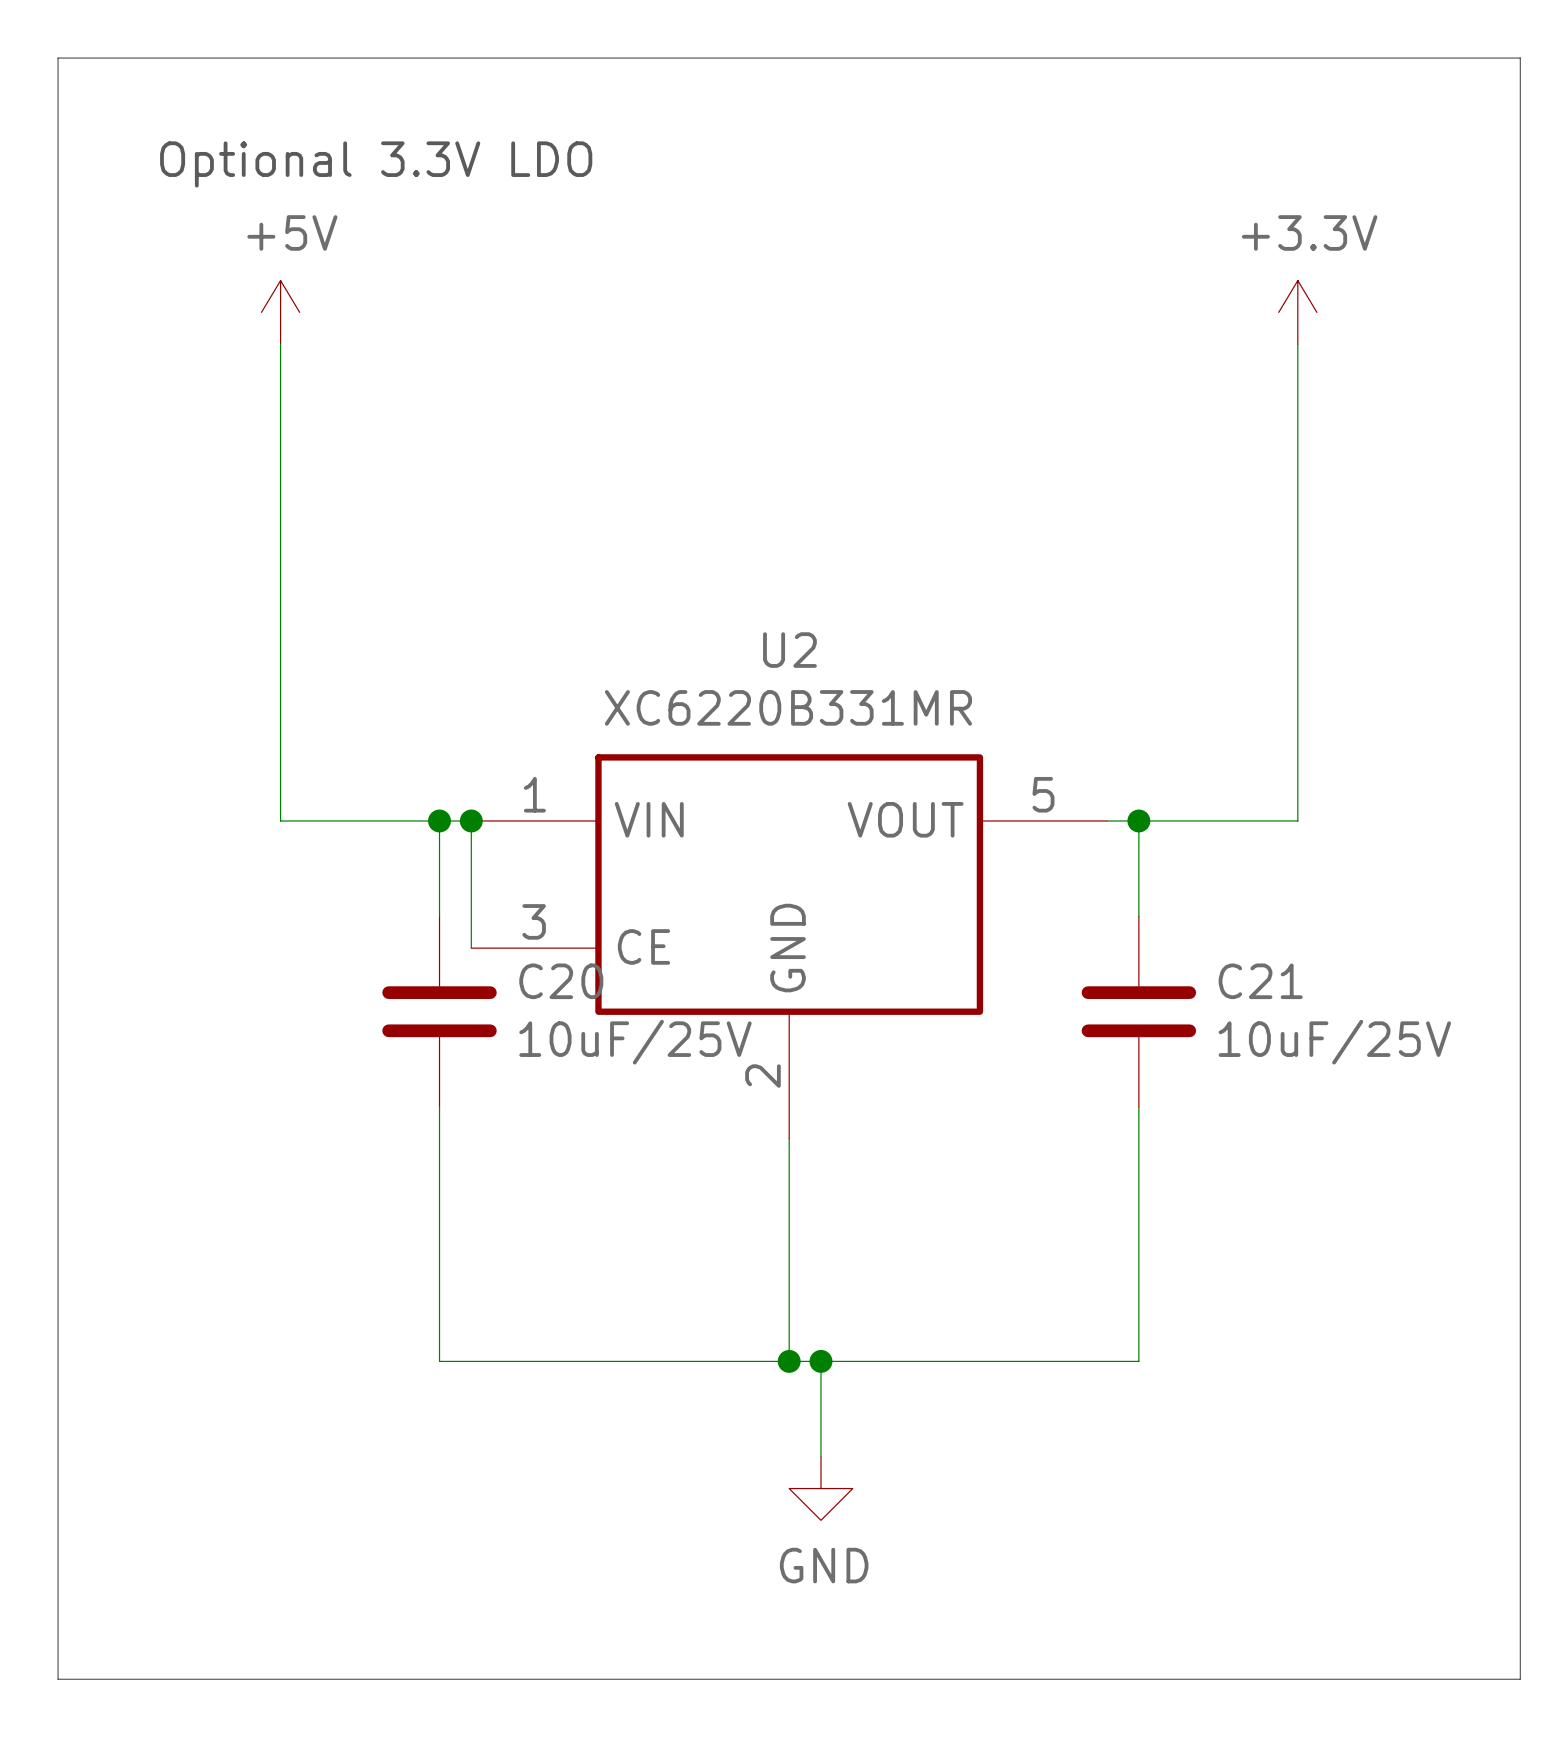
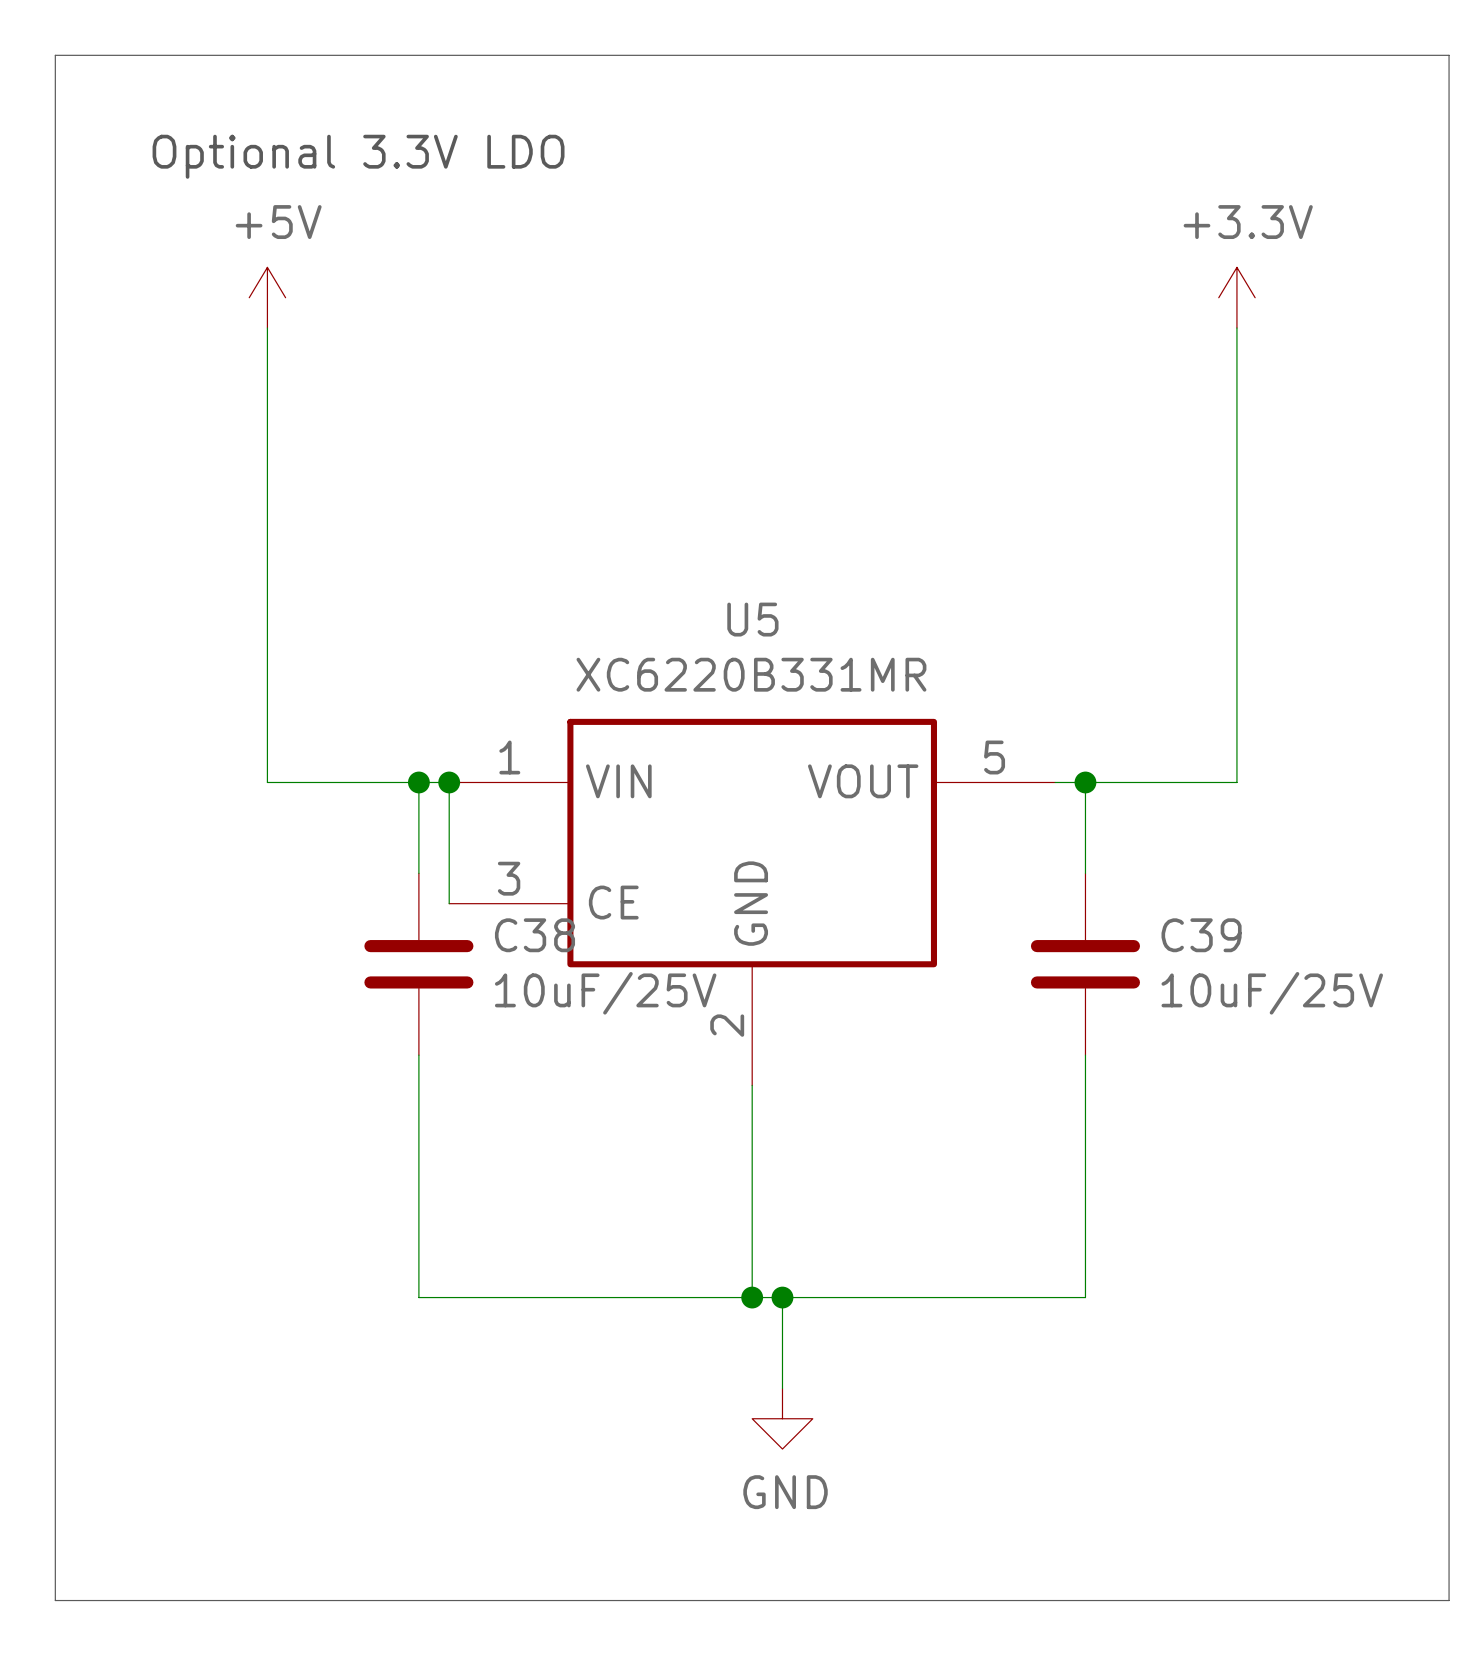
U2 name: U2 (789, 650) -> U5 (752, 619)
C20 name: C20 (561, 981) -> C38 (534, 935)
C21 name: C21 (1260, 981) -> C39 (1201, 935)

